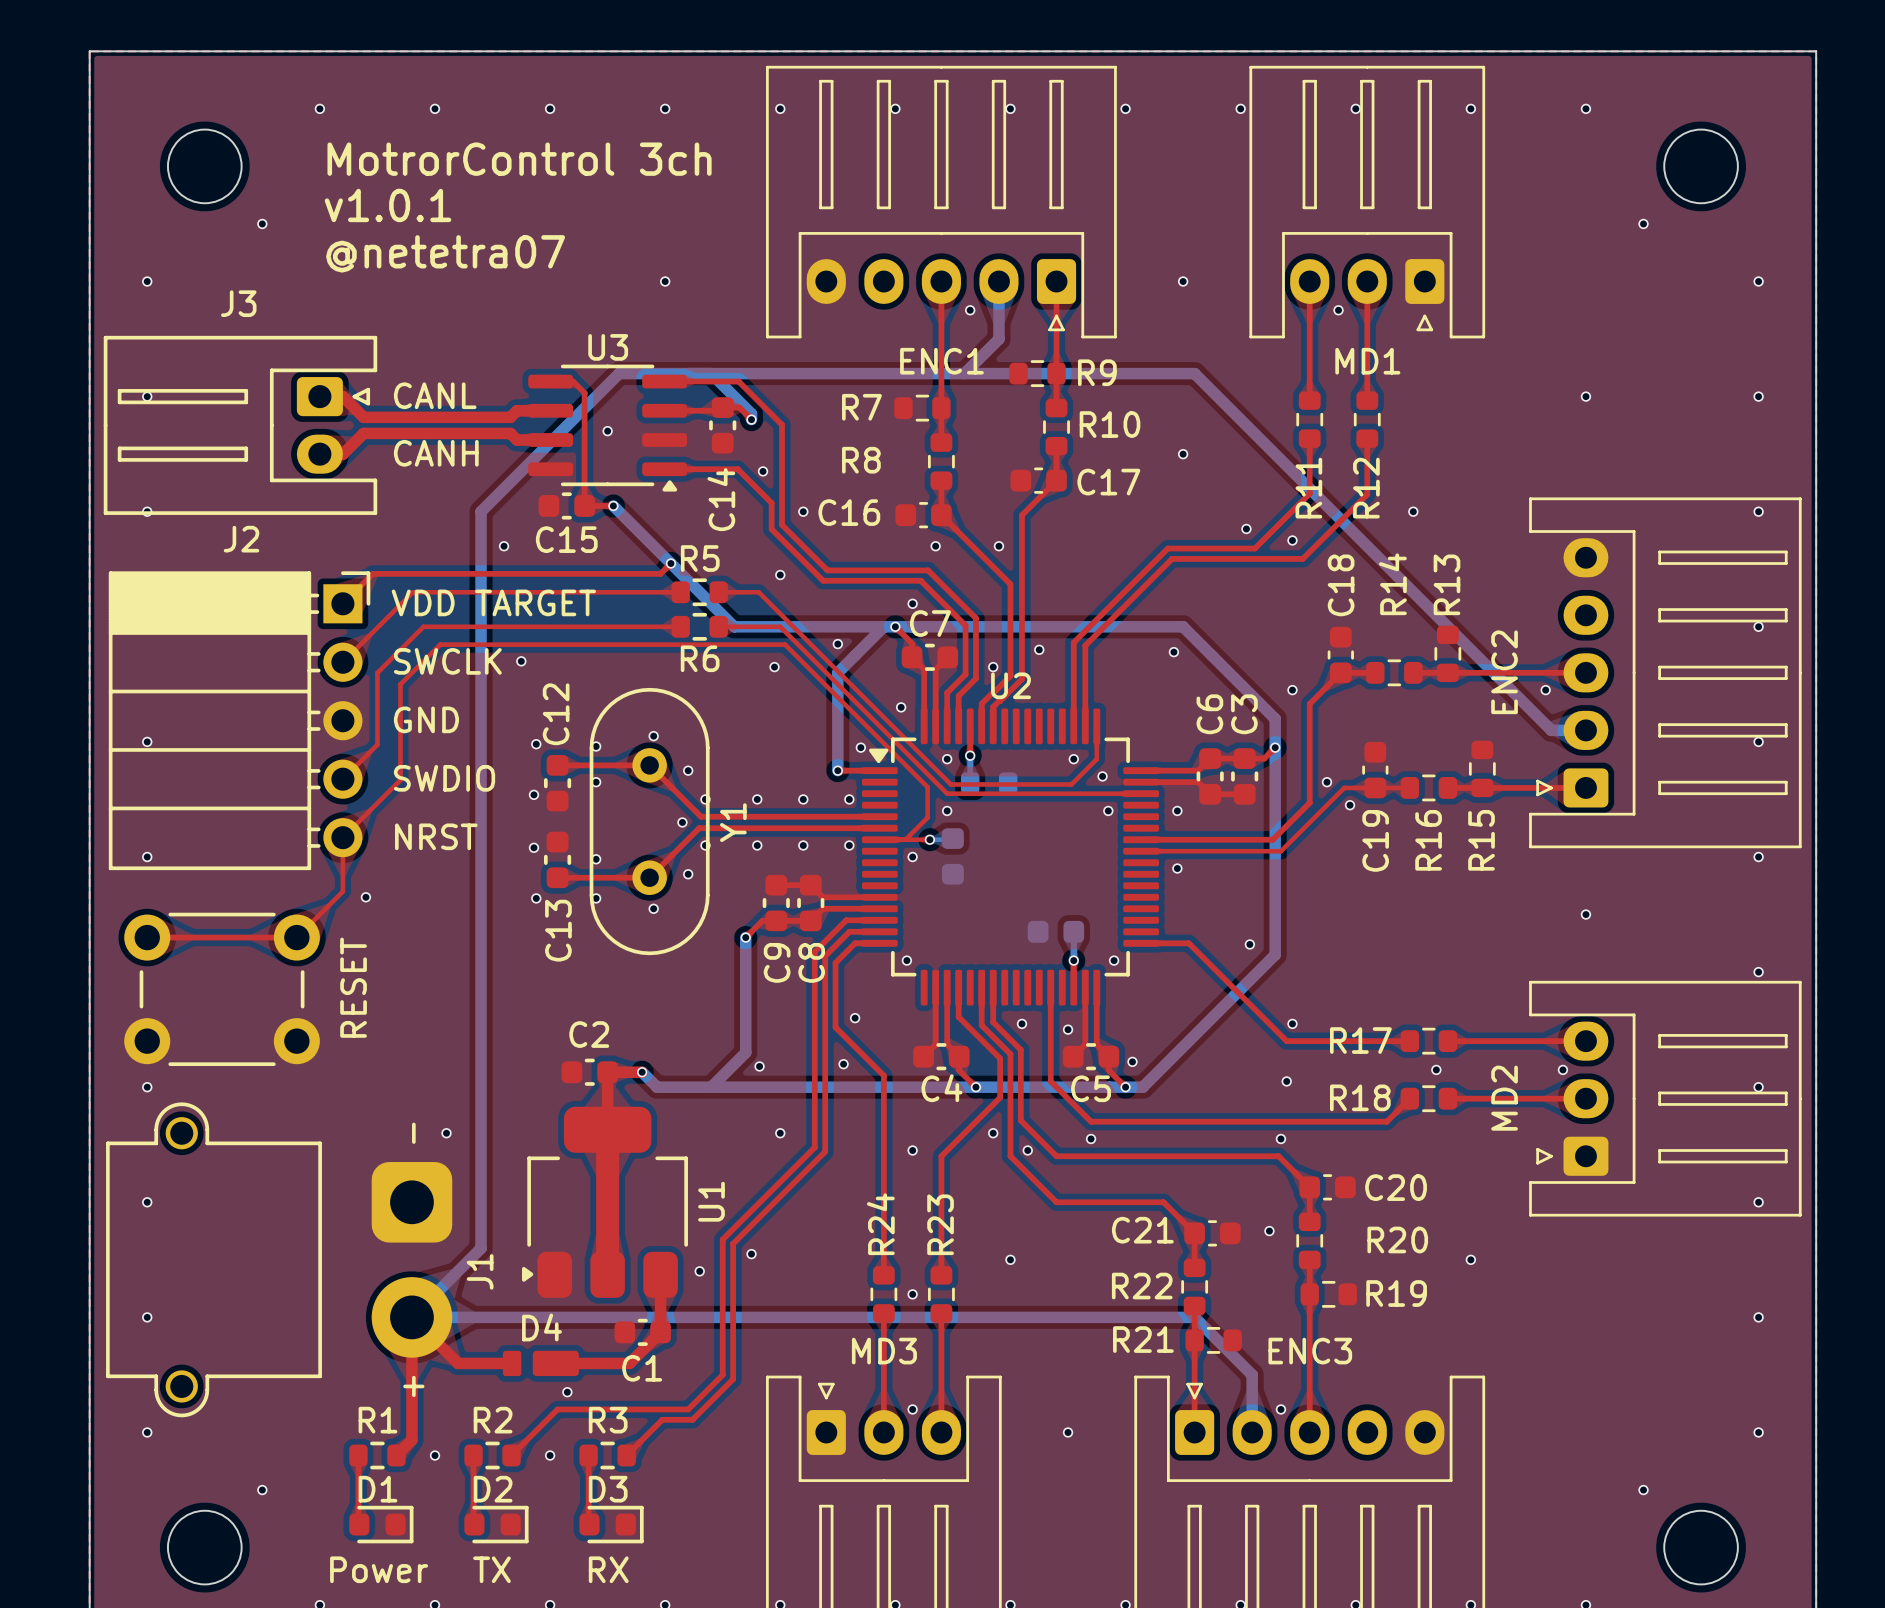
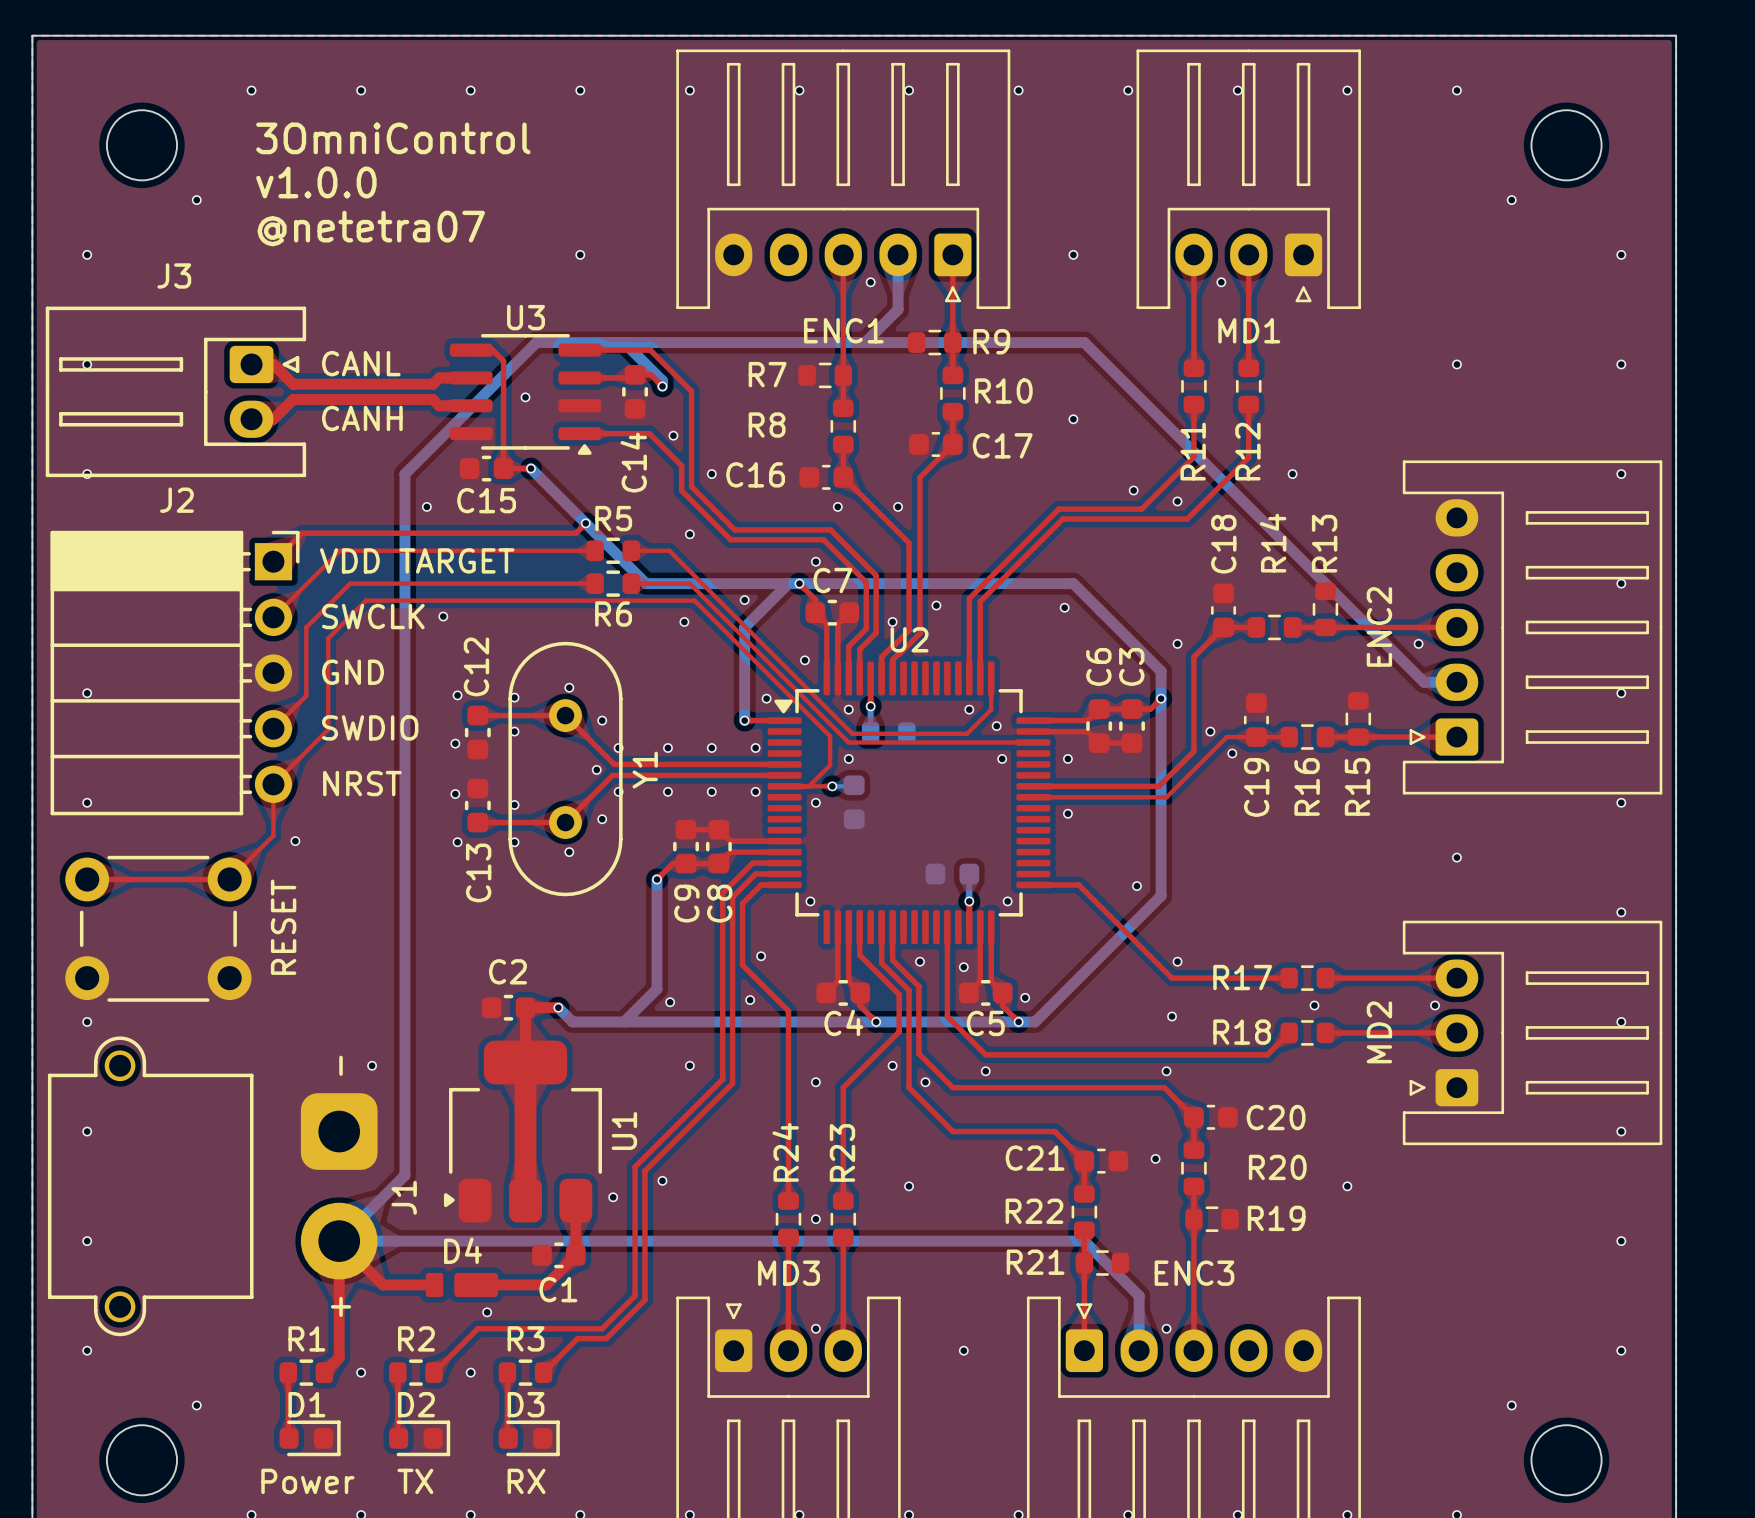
text: MotrorControl 3ch (519, 159) -> 3OmniControl (393, 138)
text: v1.0.1 (388, 205) -> v1.0.0 (316, 182)

